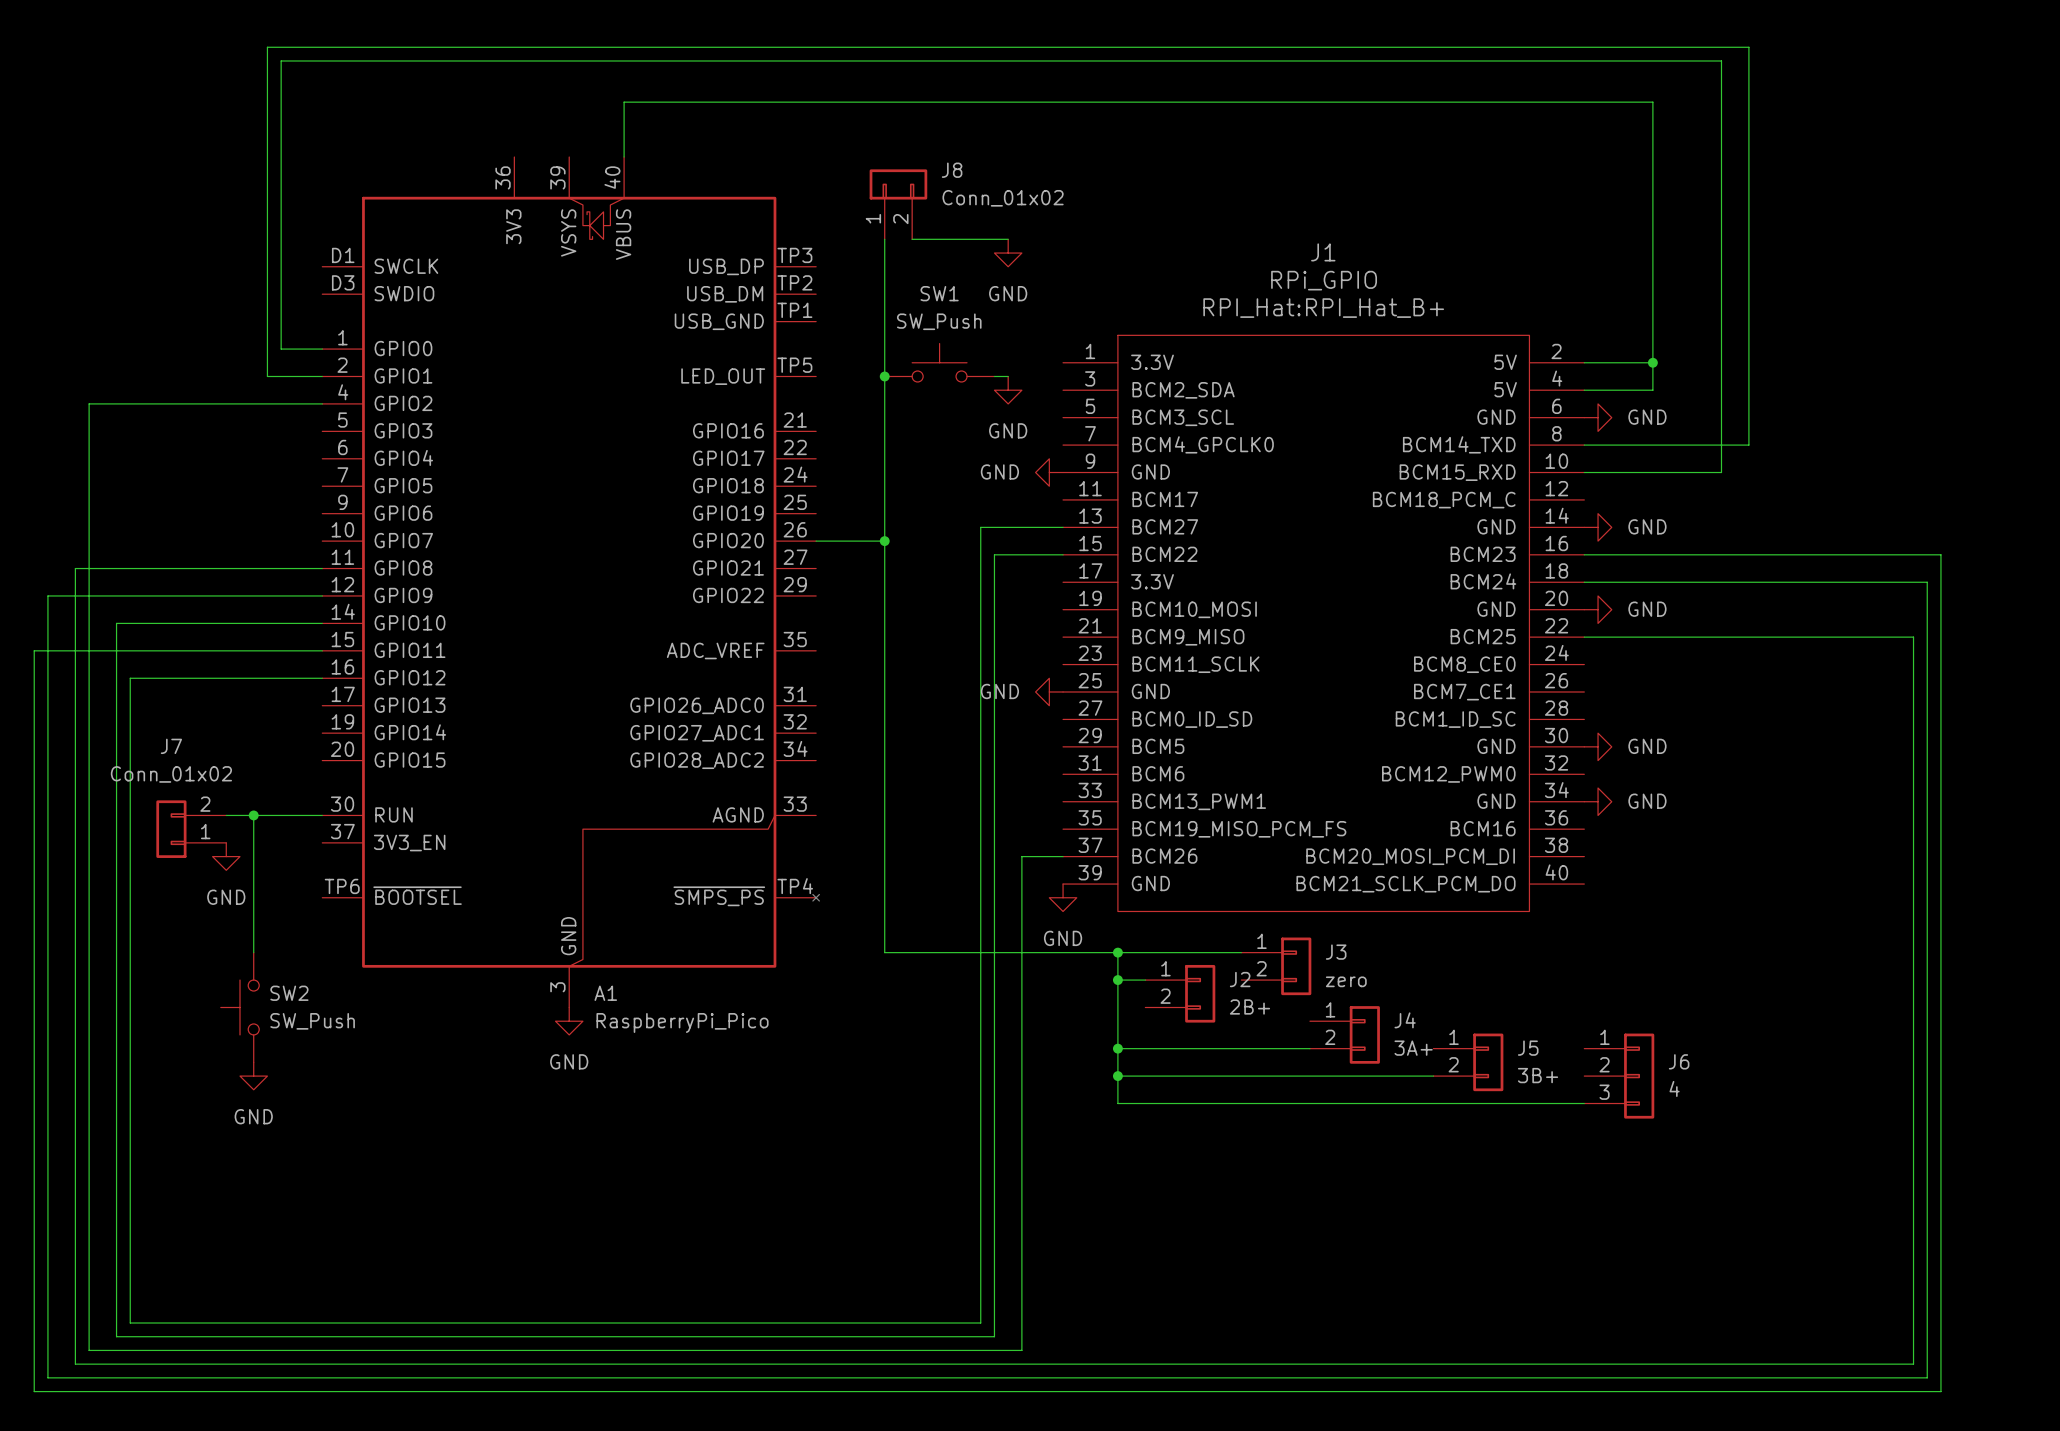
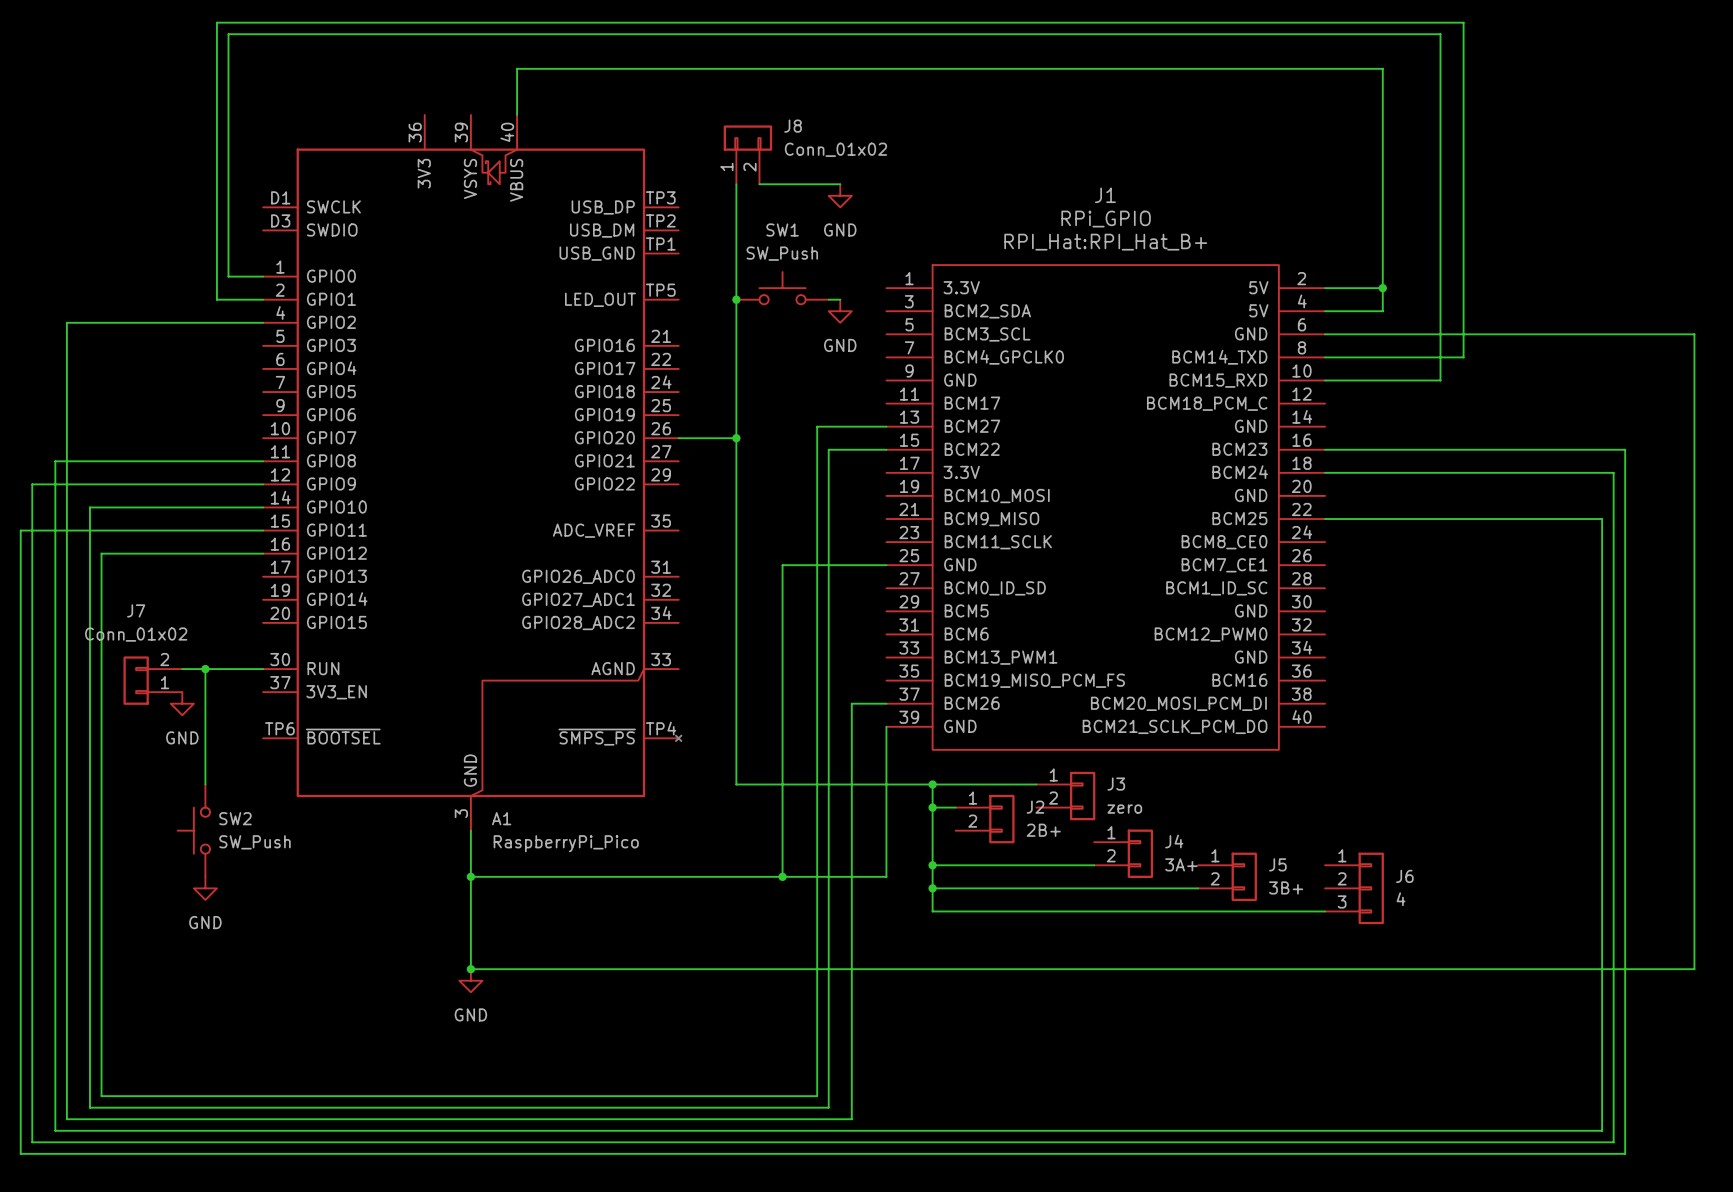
wire: none -> (1325, 334) (1694, 334) (1694, 969) (470, 969) (470, 830)
power symbol: GND (1598, 417) -> none
power symbol: GND (1049, 472) -> none
power symbol: GND (1598, 527) -> none
power symbol: GND (1598, 609) -> none
power symbol: GND (1049, 691) -> none
wire: none -> (886, 565) (782, 565) (782, 876)
power symbol: GND (1598, 746) -> none
power symbol: GND (1598, 801) -> none
wire: none -> (886, 726) (886, 876) (470, 876)
power symbol: GND (1063, 897) -> none
power symbol position: GND (569, 1021) -> GND (470, 980)
junction: none -> (470, 876)
junction: none -> (782, 876)
junction: none -> (470, 969)

